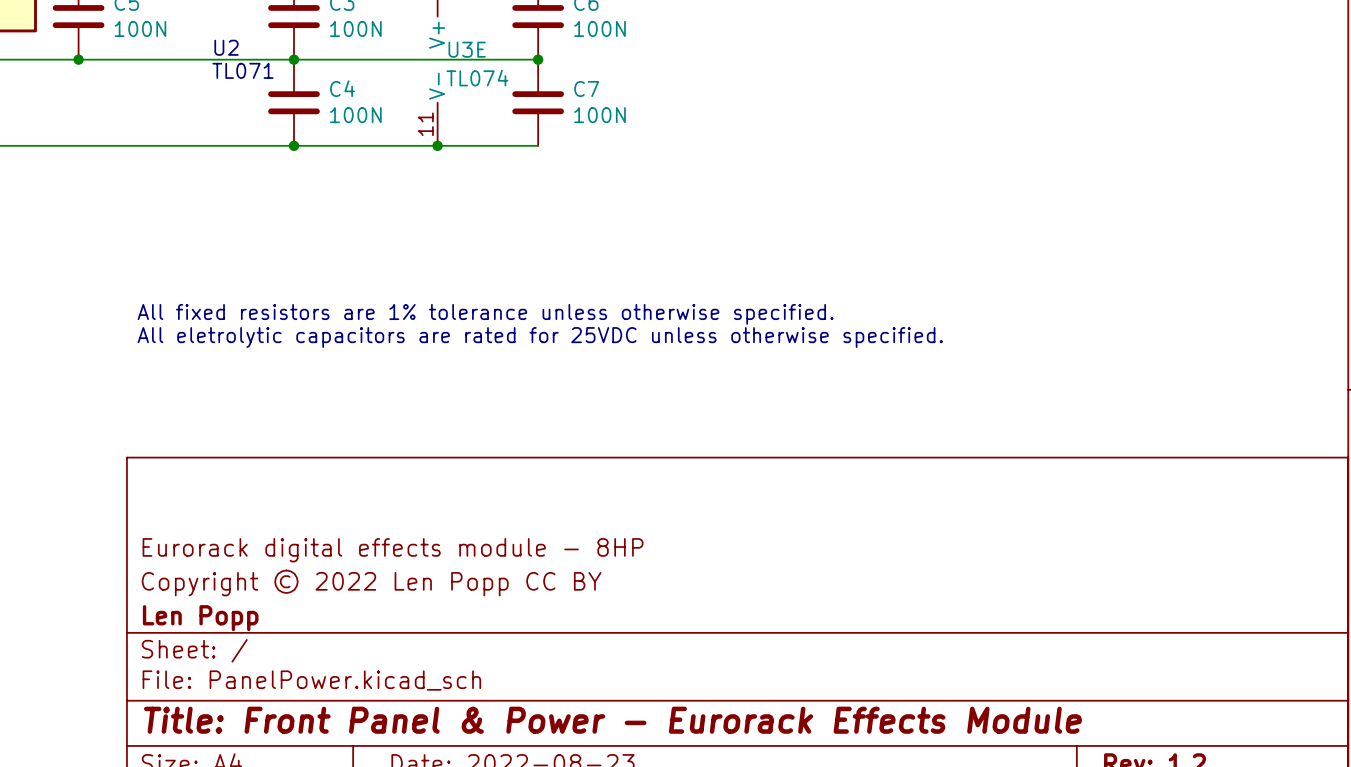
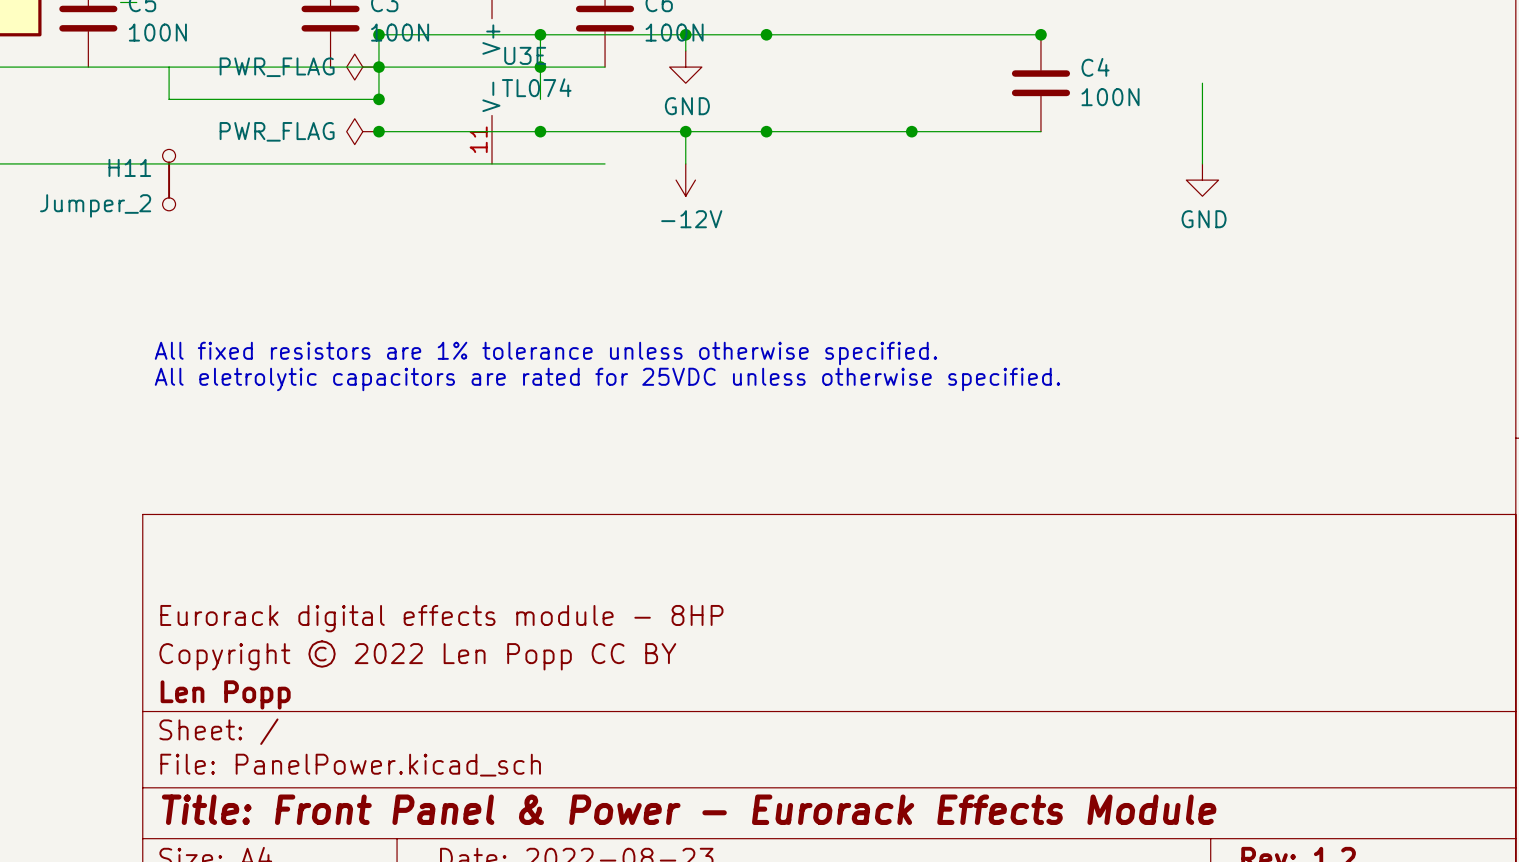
wire: none -> (120, 2) (136, 2)
junction: none -> (378, 34)
wire: none -> (540, 34) (540, 99)
junction: none -> (540, 34)
wire: none -> (685, 34) (685, 50)
junction: none -> (685, 34)
junction: none -> (766, 34)
wire: none -> (1040, 34) (378, 34) (378, 99) (169, 99) (169, 67)
junction: none -> (1040, 34)
text: U2 (226, 47) -> none
junction: (78, 59) -> none
junction: (294, 59) -> none
power symbol: none -> PWR_FLAG (362, 67)
junction: none -> (378, 67)
junction: none -> (540, 67)
junction: (538, 59) -> none
power symbol: none -> GND (685, 67)
text: TL071 (242, 70) -> none
wire: none -> (1202, 83) (1202, 163)
junction: none -> (378, 99)
C4 position: (294, 102) -> (1040, 83)
C7: 100N (538, 102) -> none
power symbol: none -> PWR_FLAG (362, 131)
wire: none -> (378, 131) (1040, 131)
junction: none -> (378, 131)
junction: none -> (540, 131)
wire: none -> (685, 131) (685, 163)
junction: none -> (685, 131)
junction: none -> (766, 131)
junction: none -> (911, 131)
junction: (294, 145) -> none
junction: (437, 145) -> none
H11: none -> Jumper_2 (169, 180)
power symbol: none -> -12V (685, 180)
power symbol: none -> GND (1202, 180)

